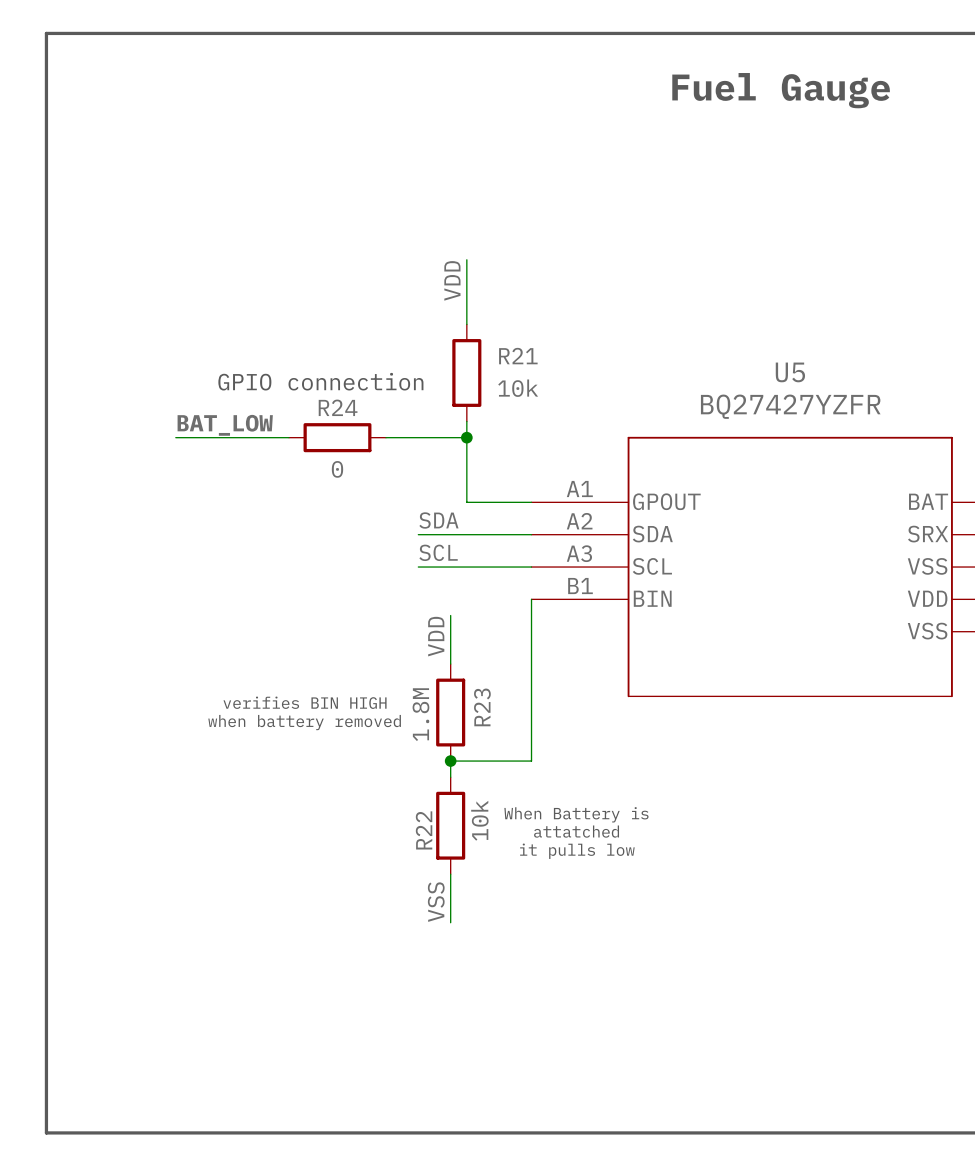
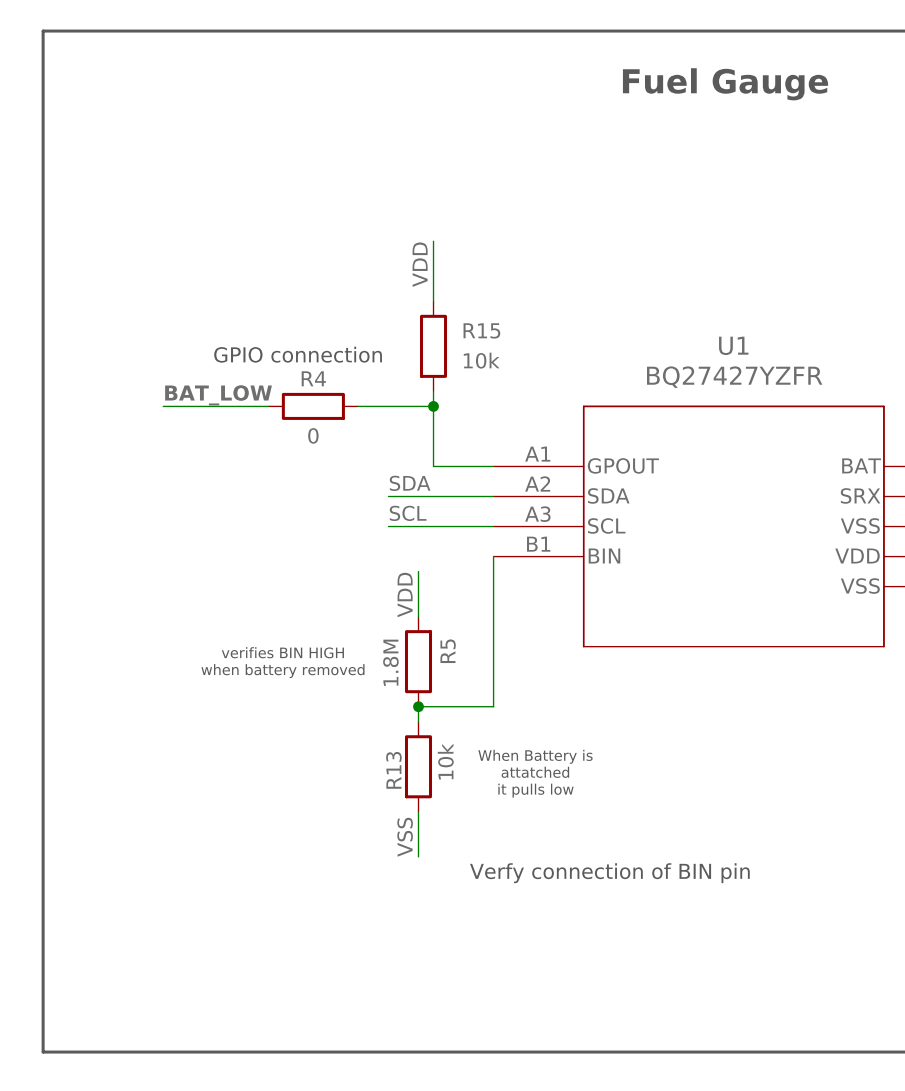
R21 name: R21 (518, 356) -> R15 (481, 330)
U5 name: U5 (790, 372) -> U1 (733, 345)
R24 name: R24 (338, 407) -> R4 (313, 378)
R23 name: R23 (482, 707) -> R5 (448, 651)
R22 name: R22 (424, 830) -> R13 (393, 770)
text: none -> Verfy connection of BIN pin (609, 873)

